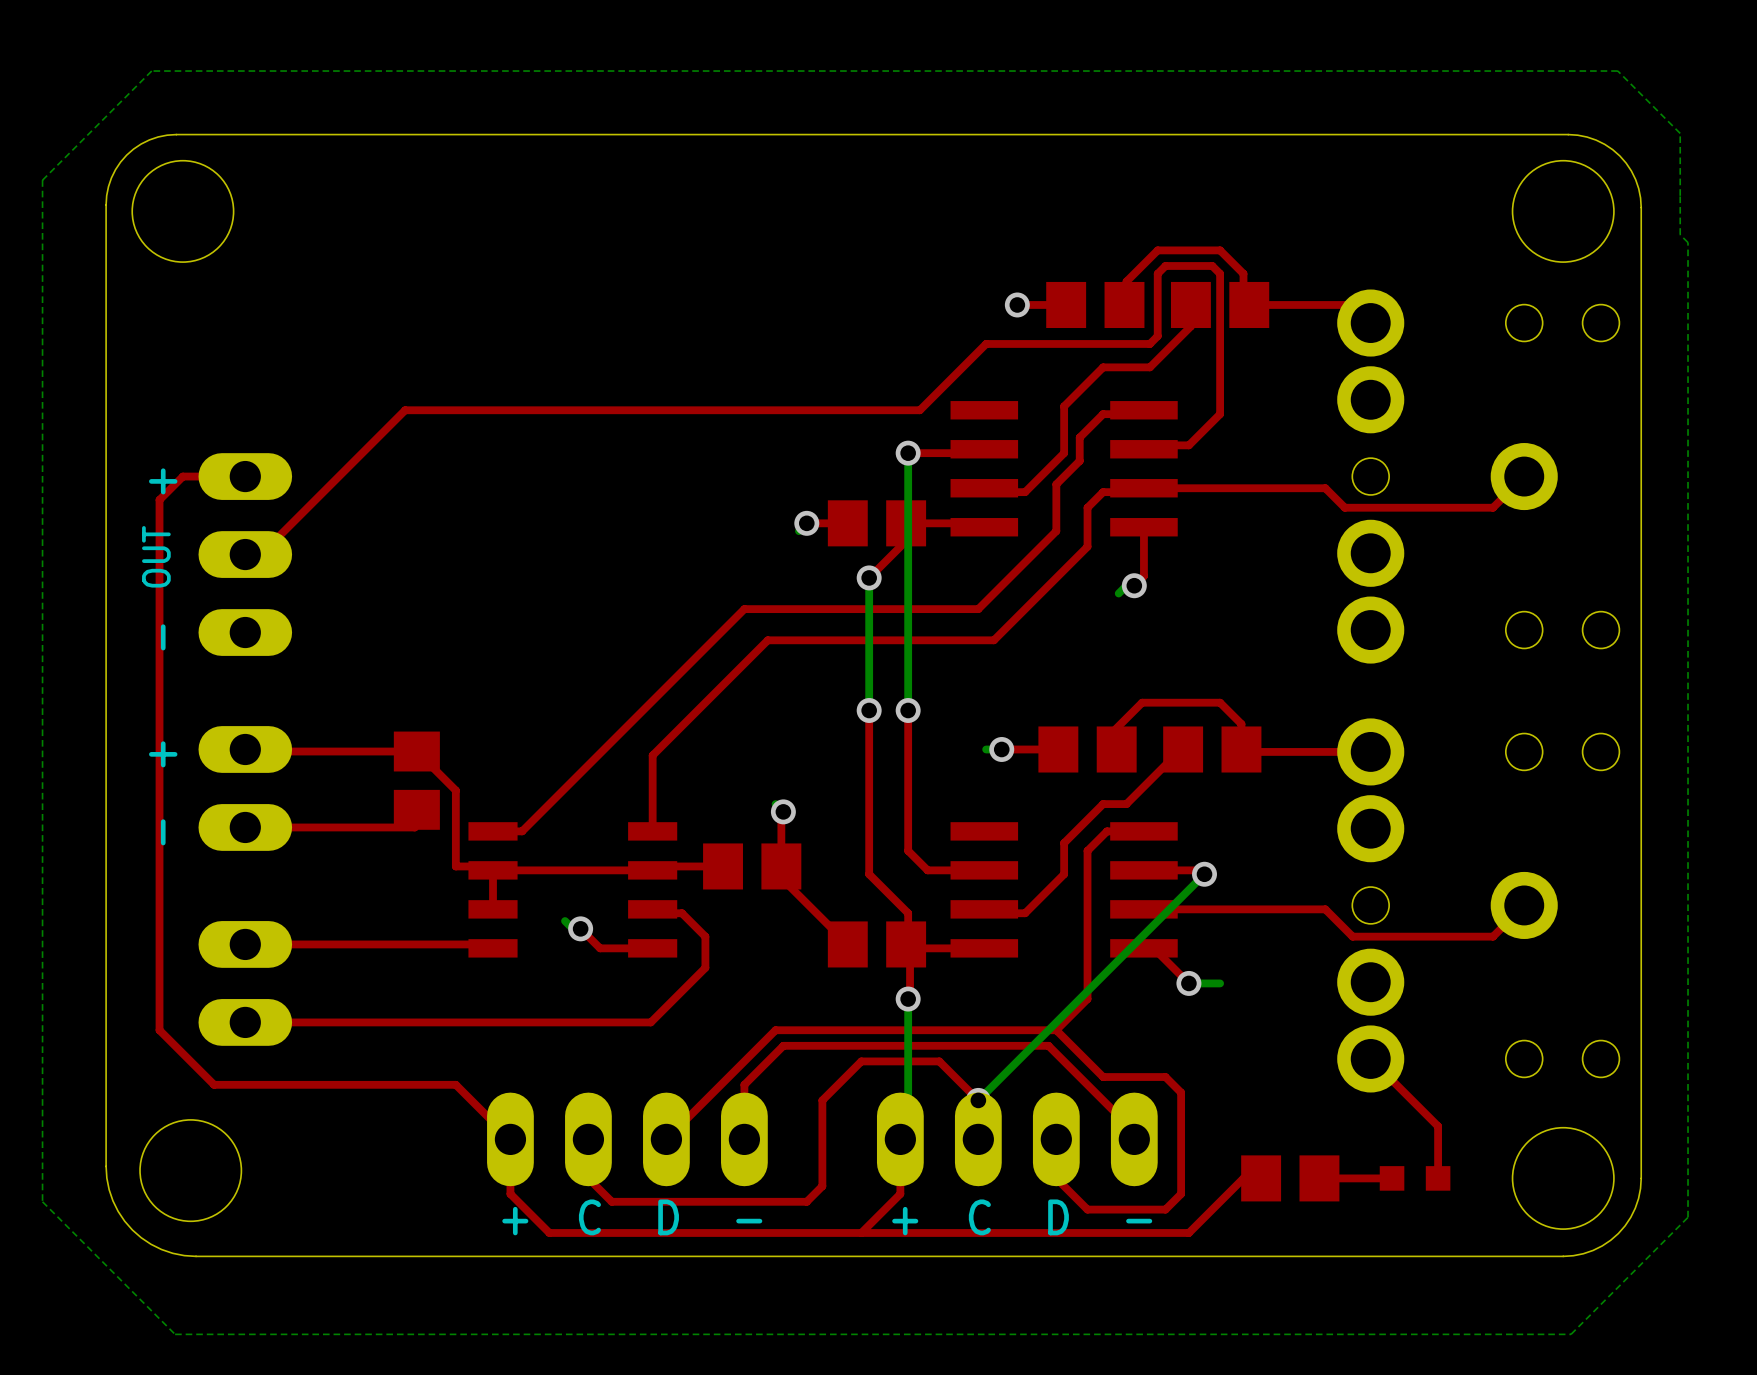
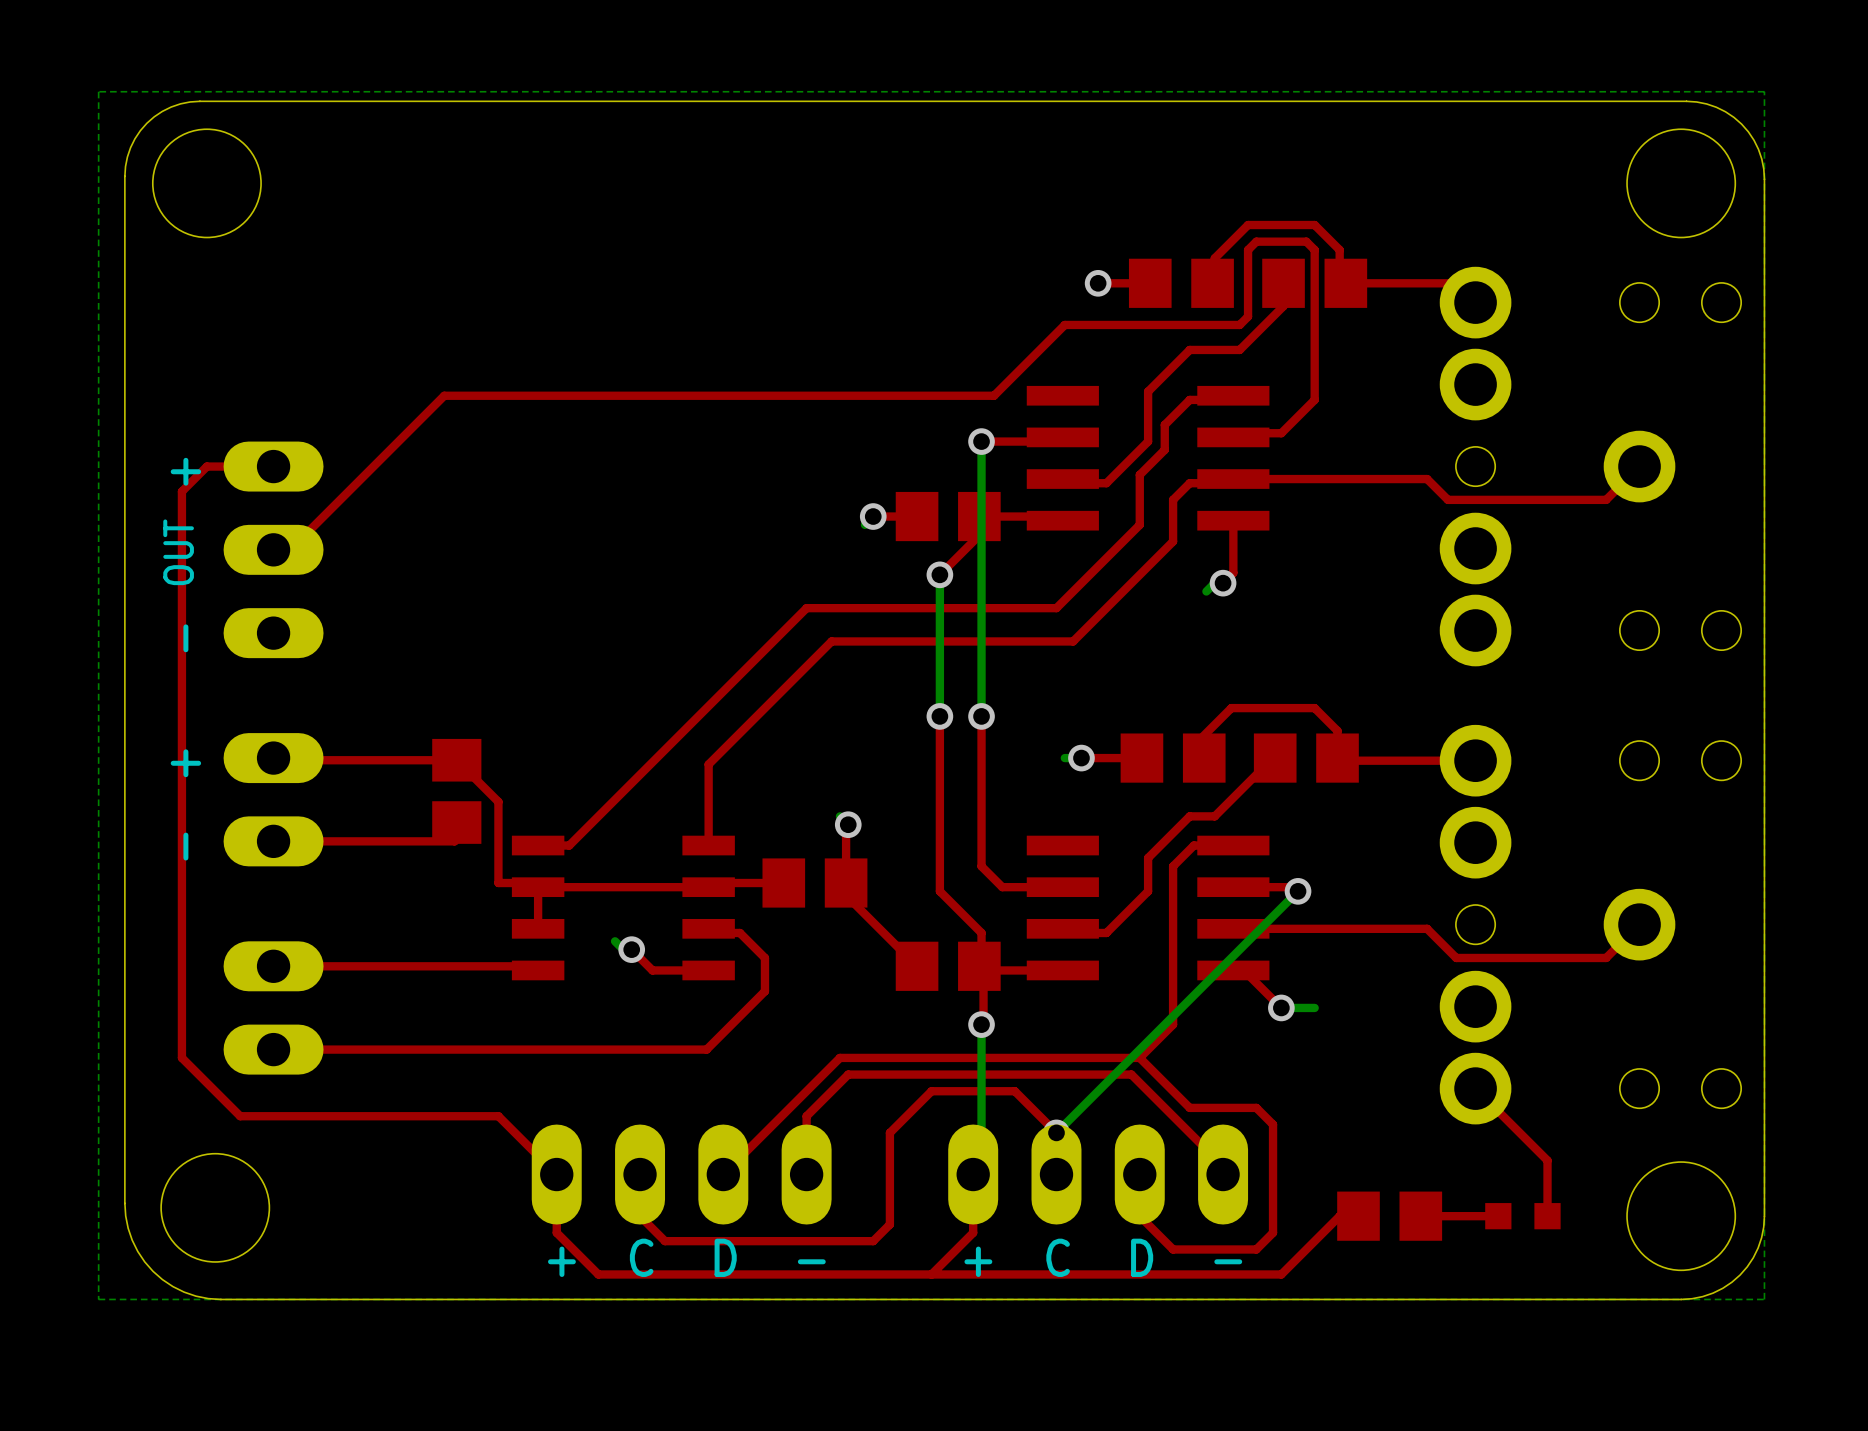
bottom zone outline: (1617, 71) (1680, 133) (1680, 234) (1688, 242) (1688, 1217) (1571, 1334) (175, 1334) (42, 1201) (42, 180) (151, 71) (1617, 71) -> (1764, 91) (1764, 1299) (98, 1299) (98, 91) (1764, 91)

